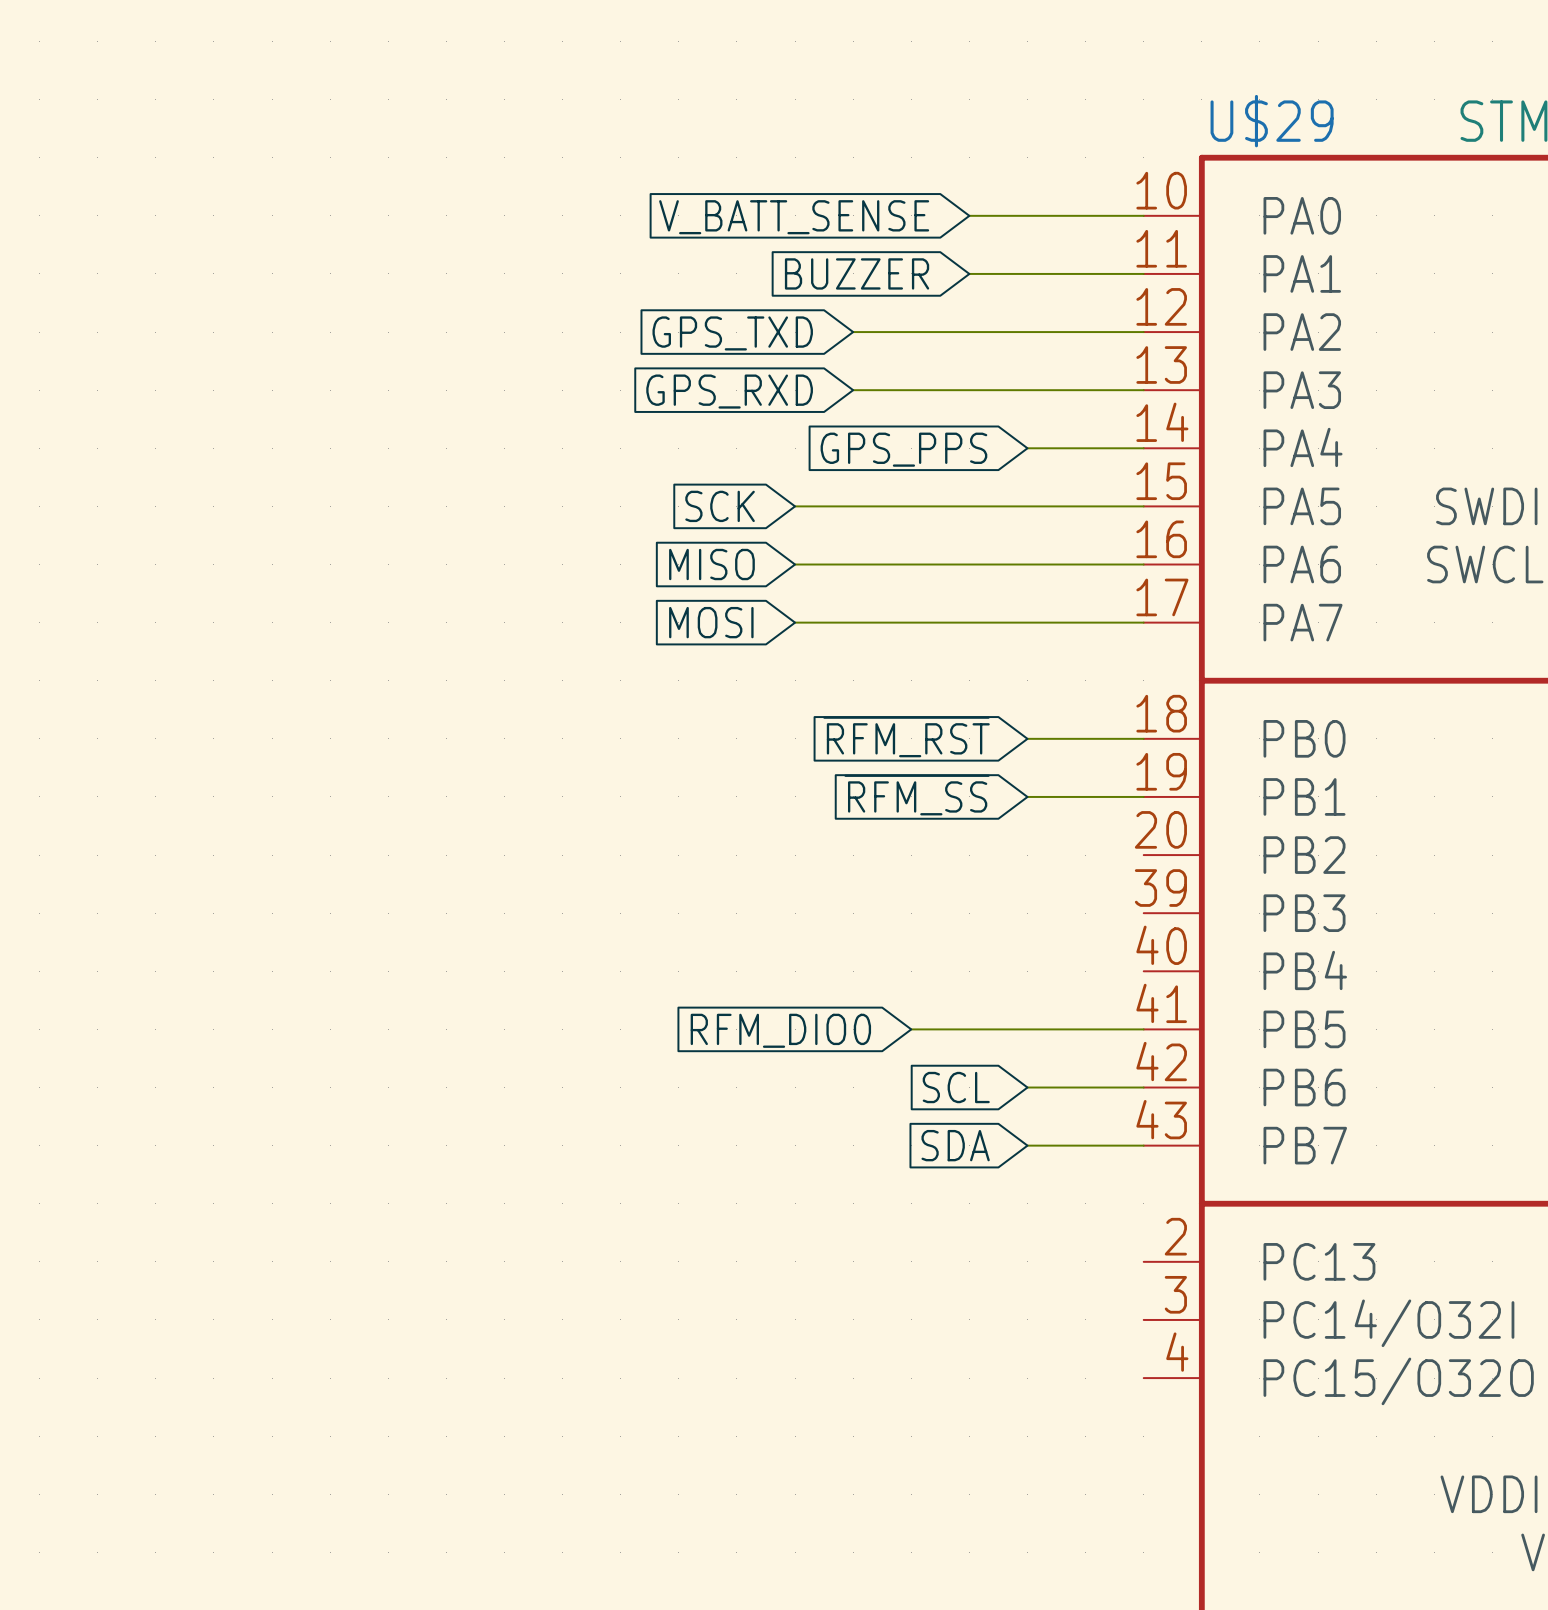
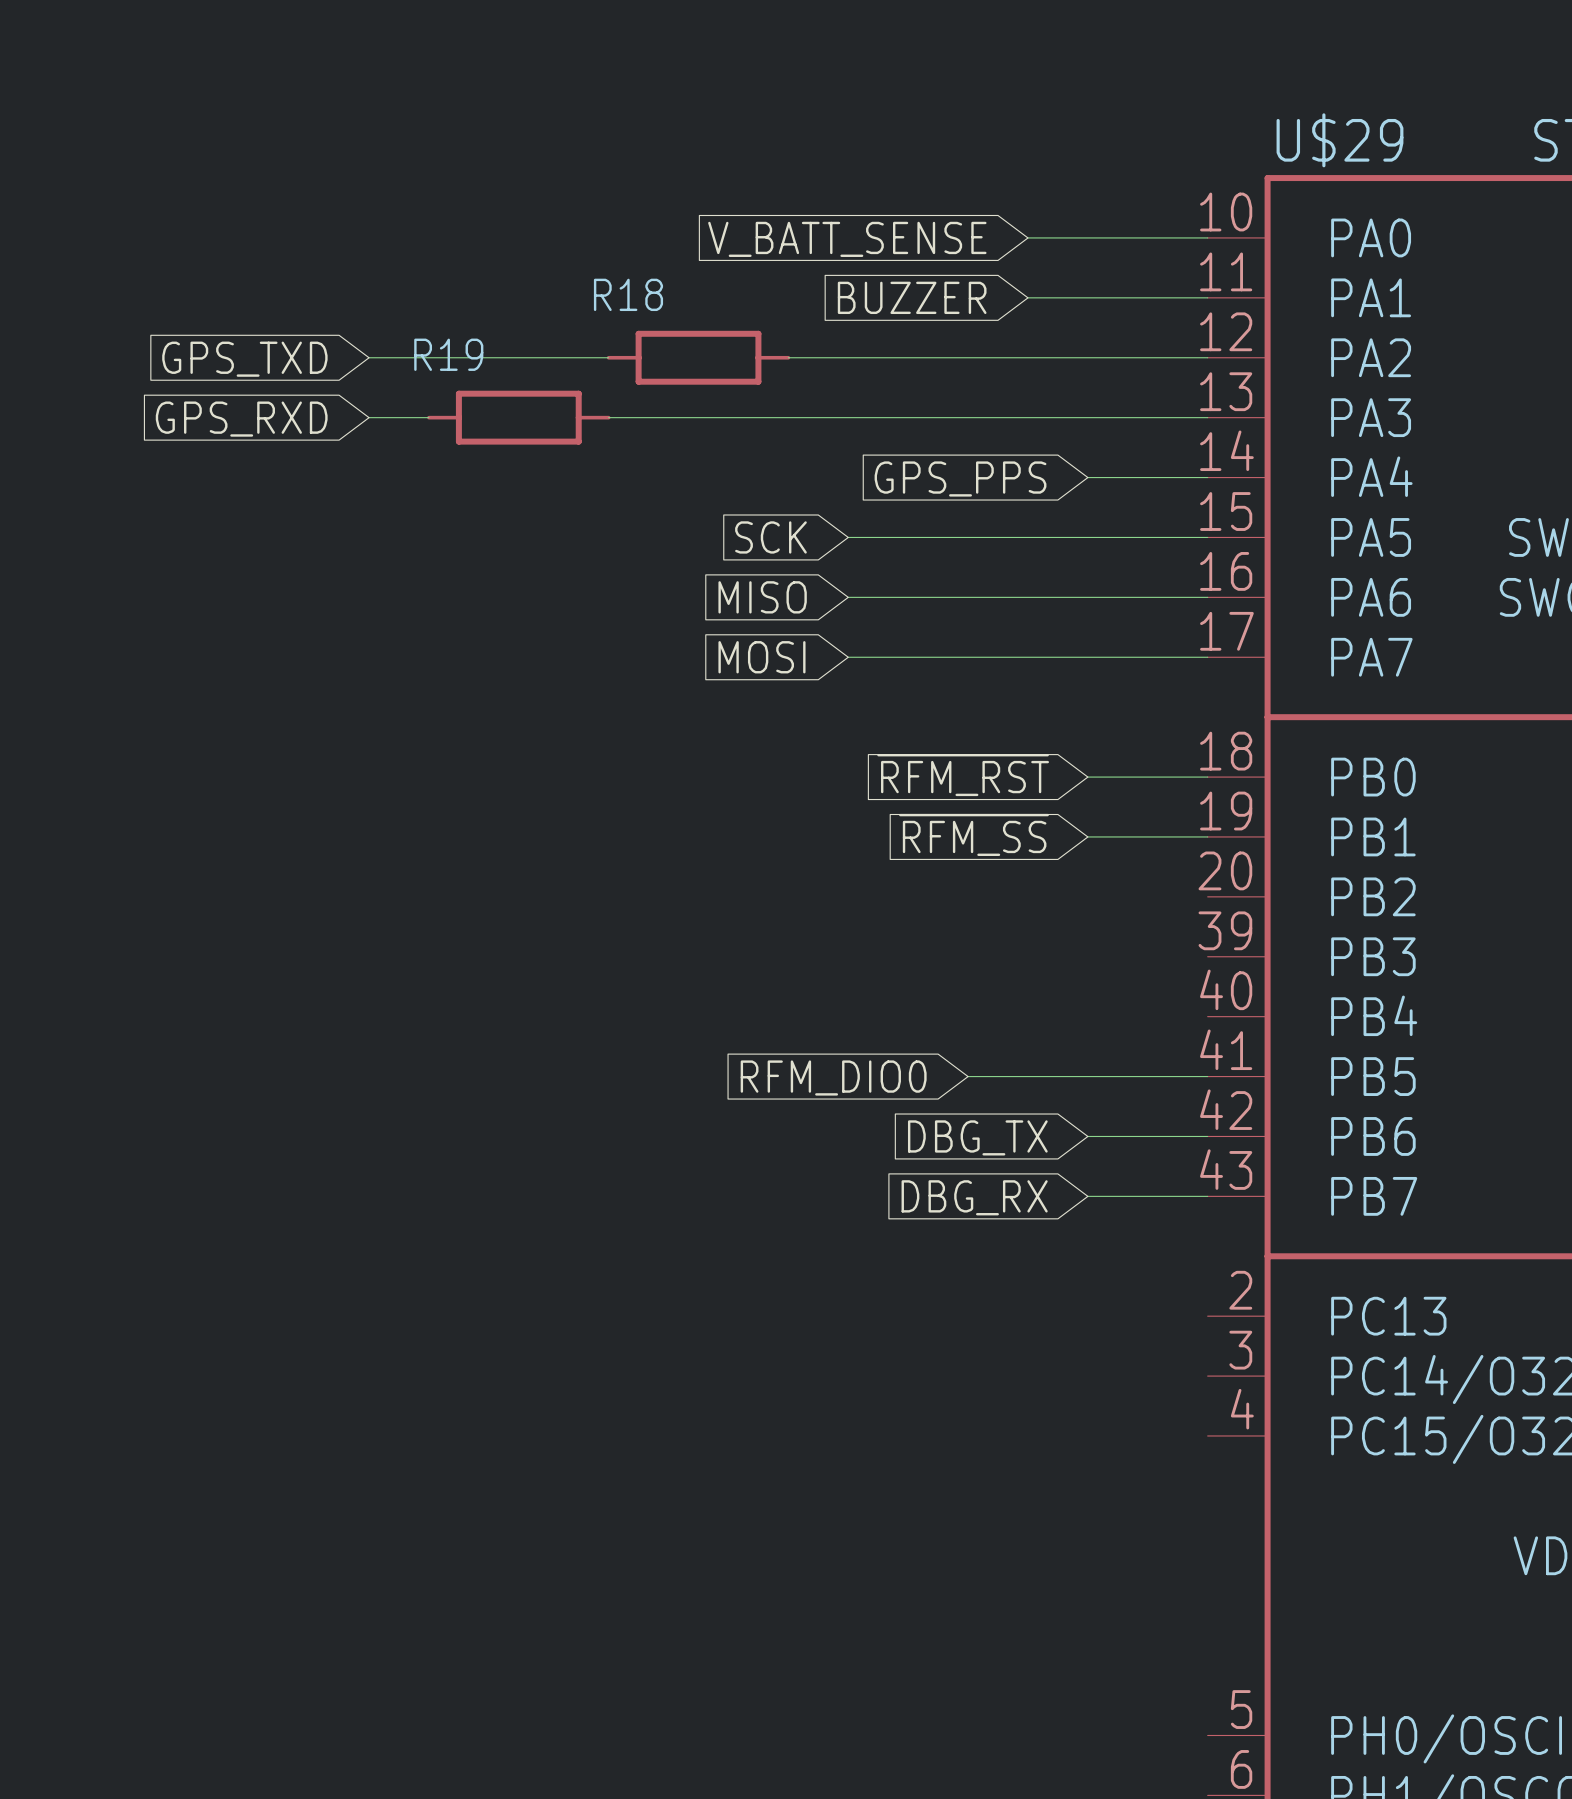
wire: none -> (369, 357) (608, 357)
R18: none -> (698, 357)
wire: none -> (788, 357) (908, 357)
global label position: GPS_TXD (732, 333) -> GPS_TXD (244, 359)
wire: none -> (369, 417) (428, 417)
R19: none -> (518, 417)
wire: none -> (608, 417) (908, 417)
global label position: GPS_RXD (729, 391) -> GPS_RXD (241, 419)
global label: SCL (956, 1087) -> DBG_TX (977, 1137)
global label: SDA (955, 1145) -> DBG_RX (974, 1197)

